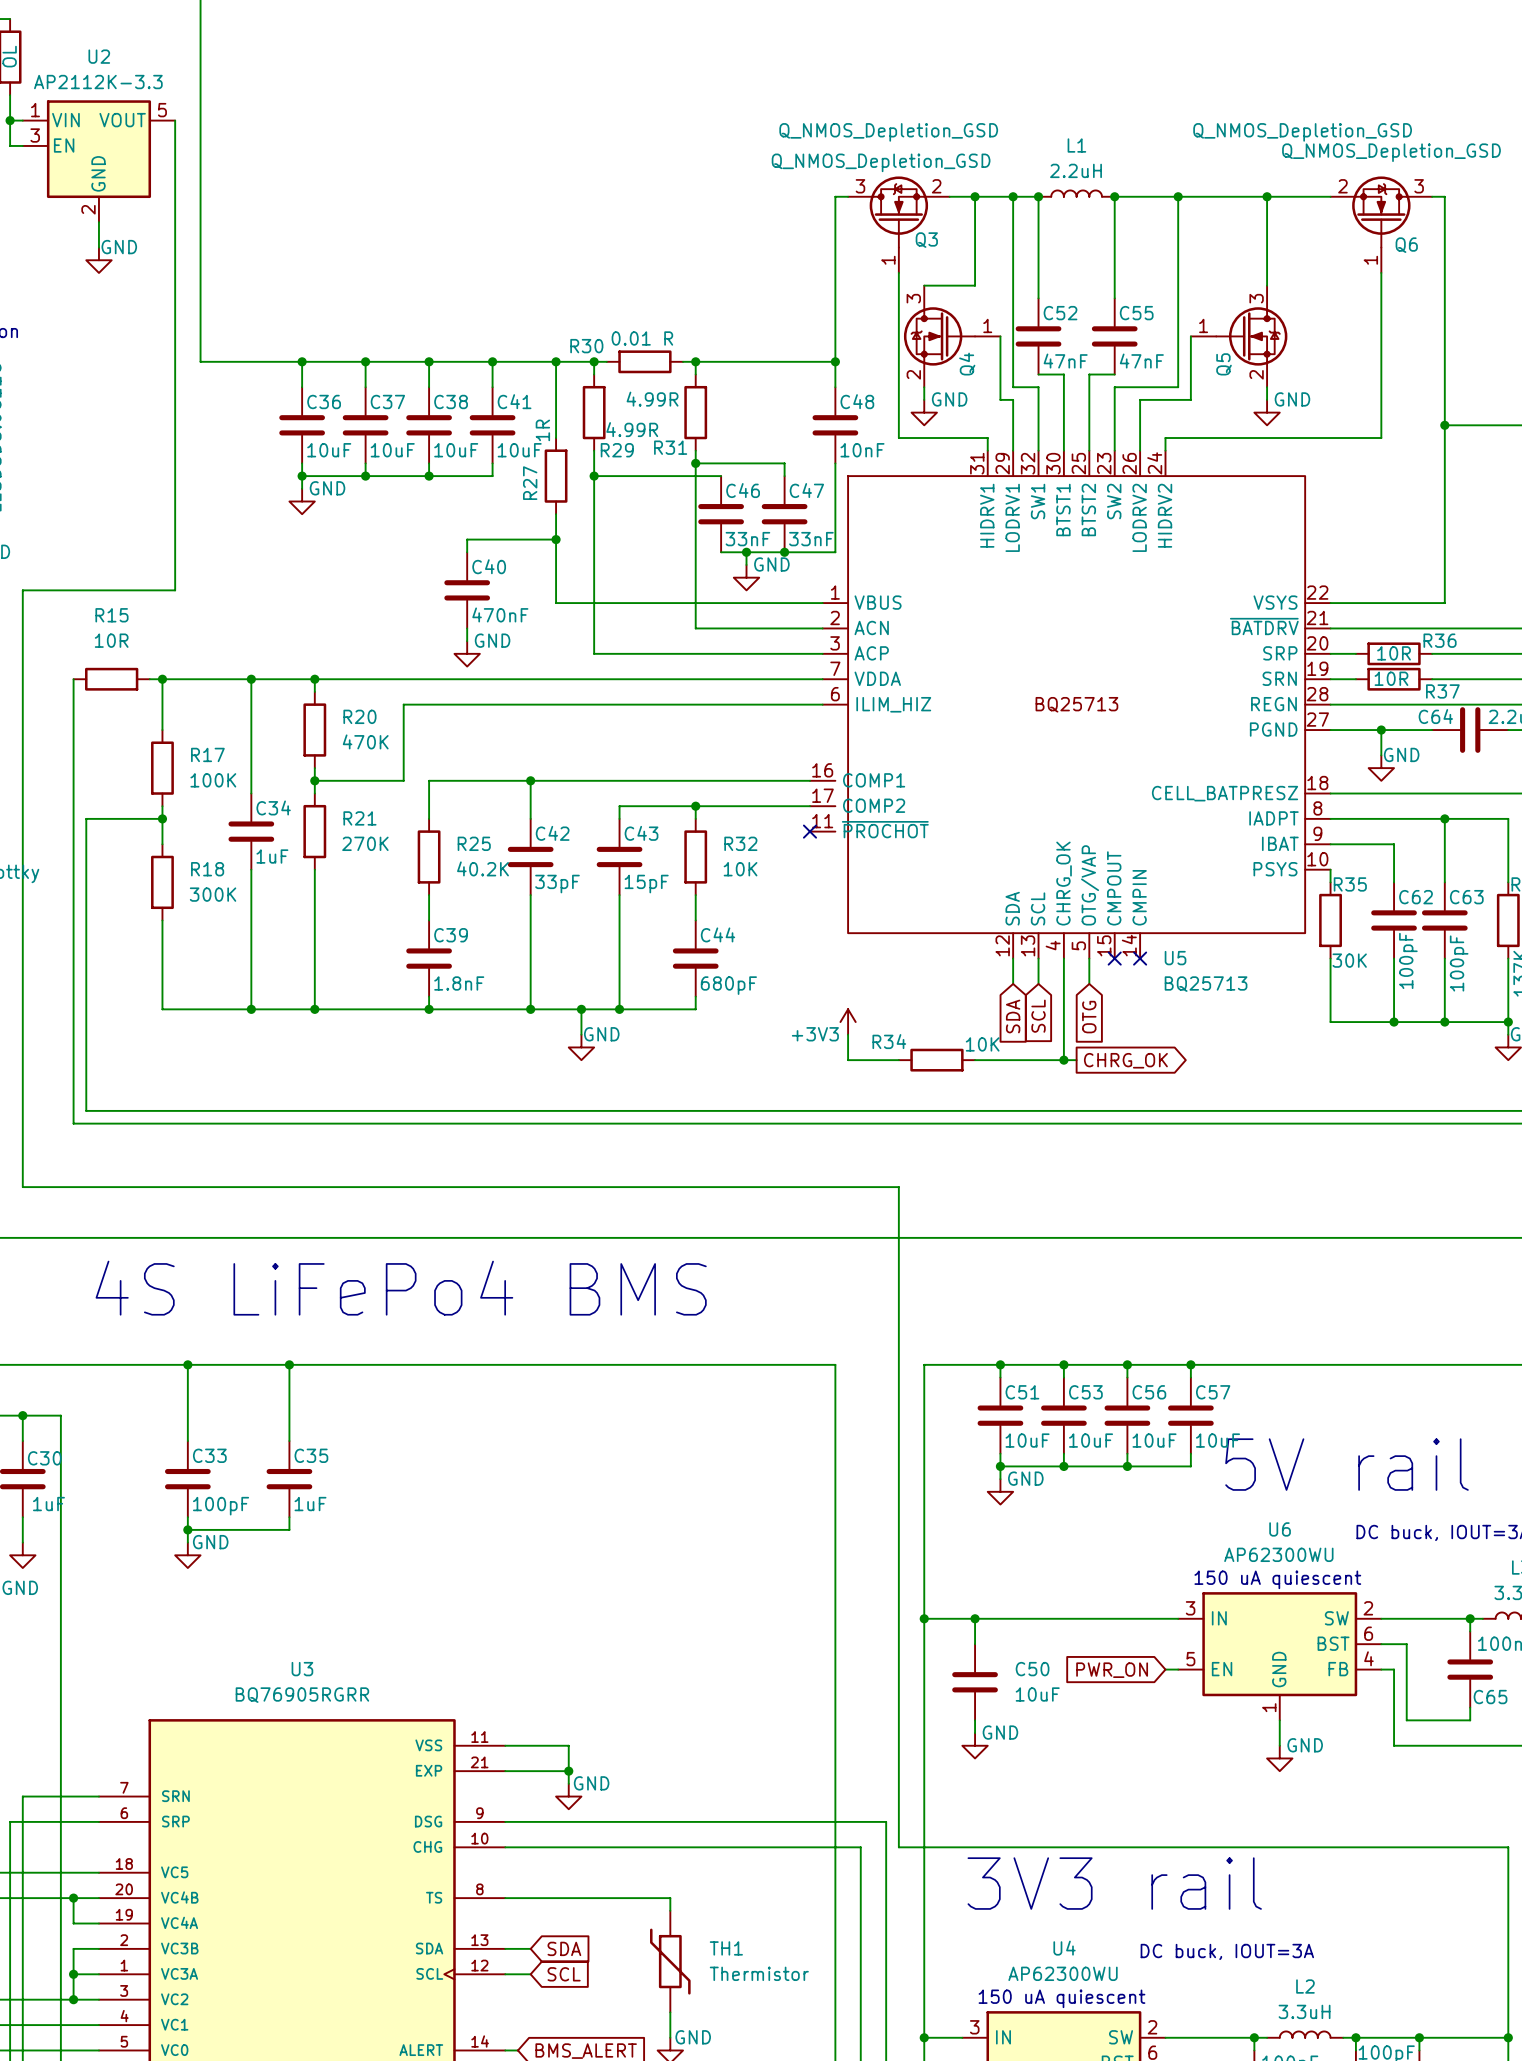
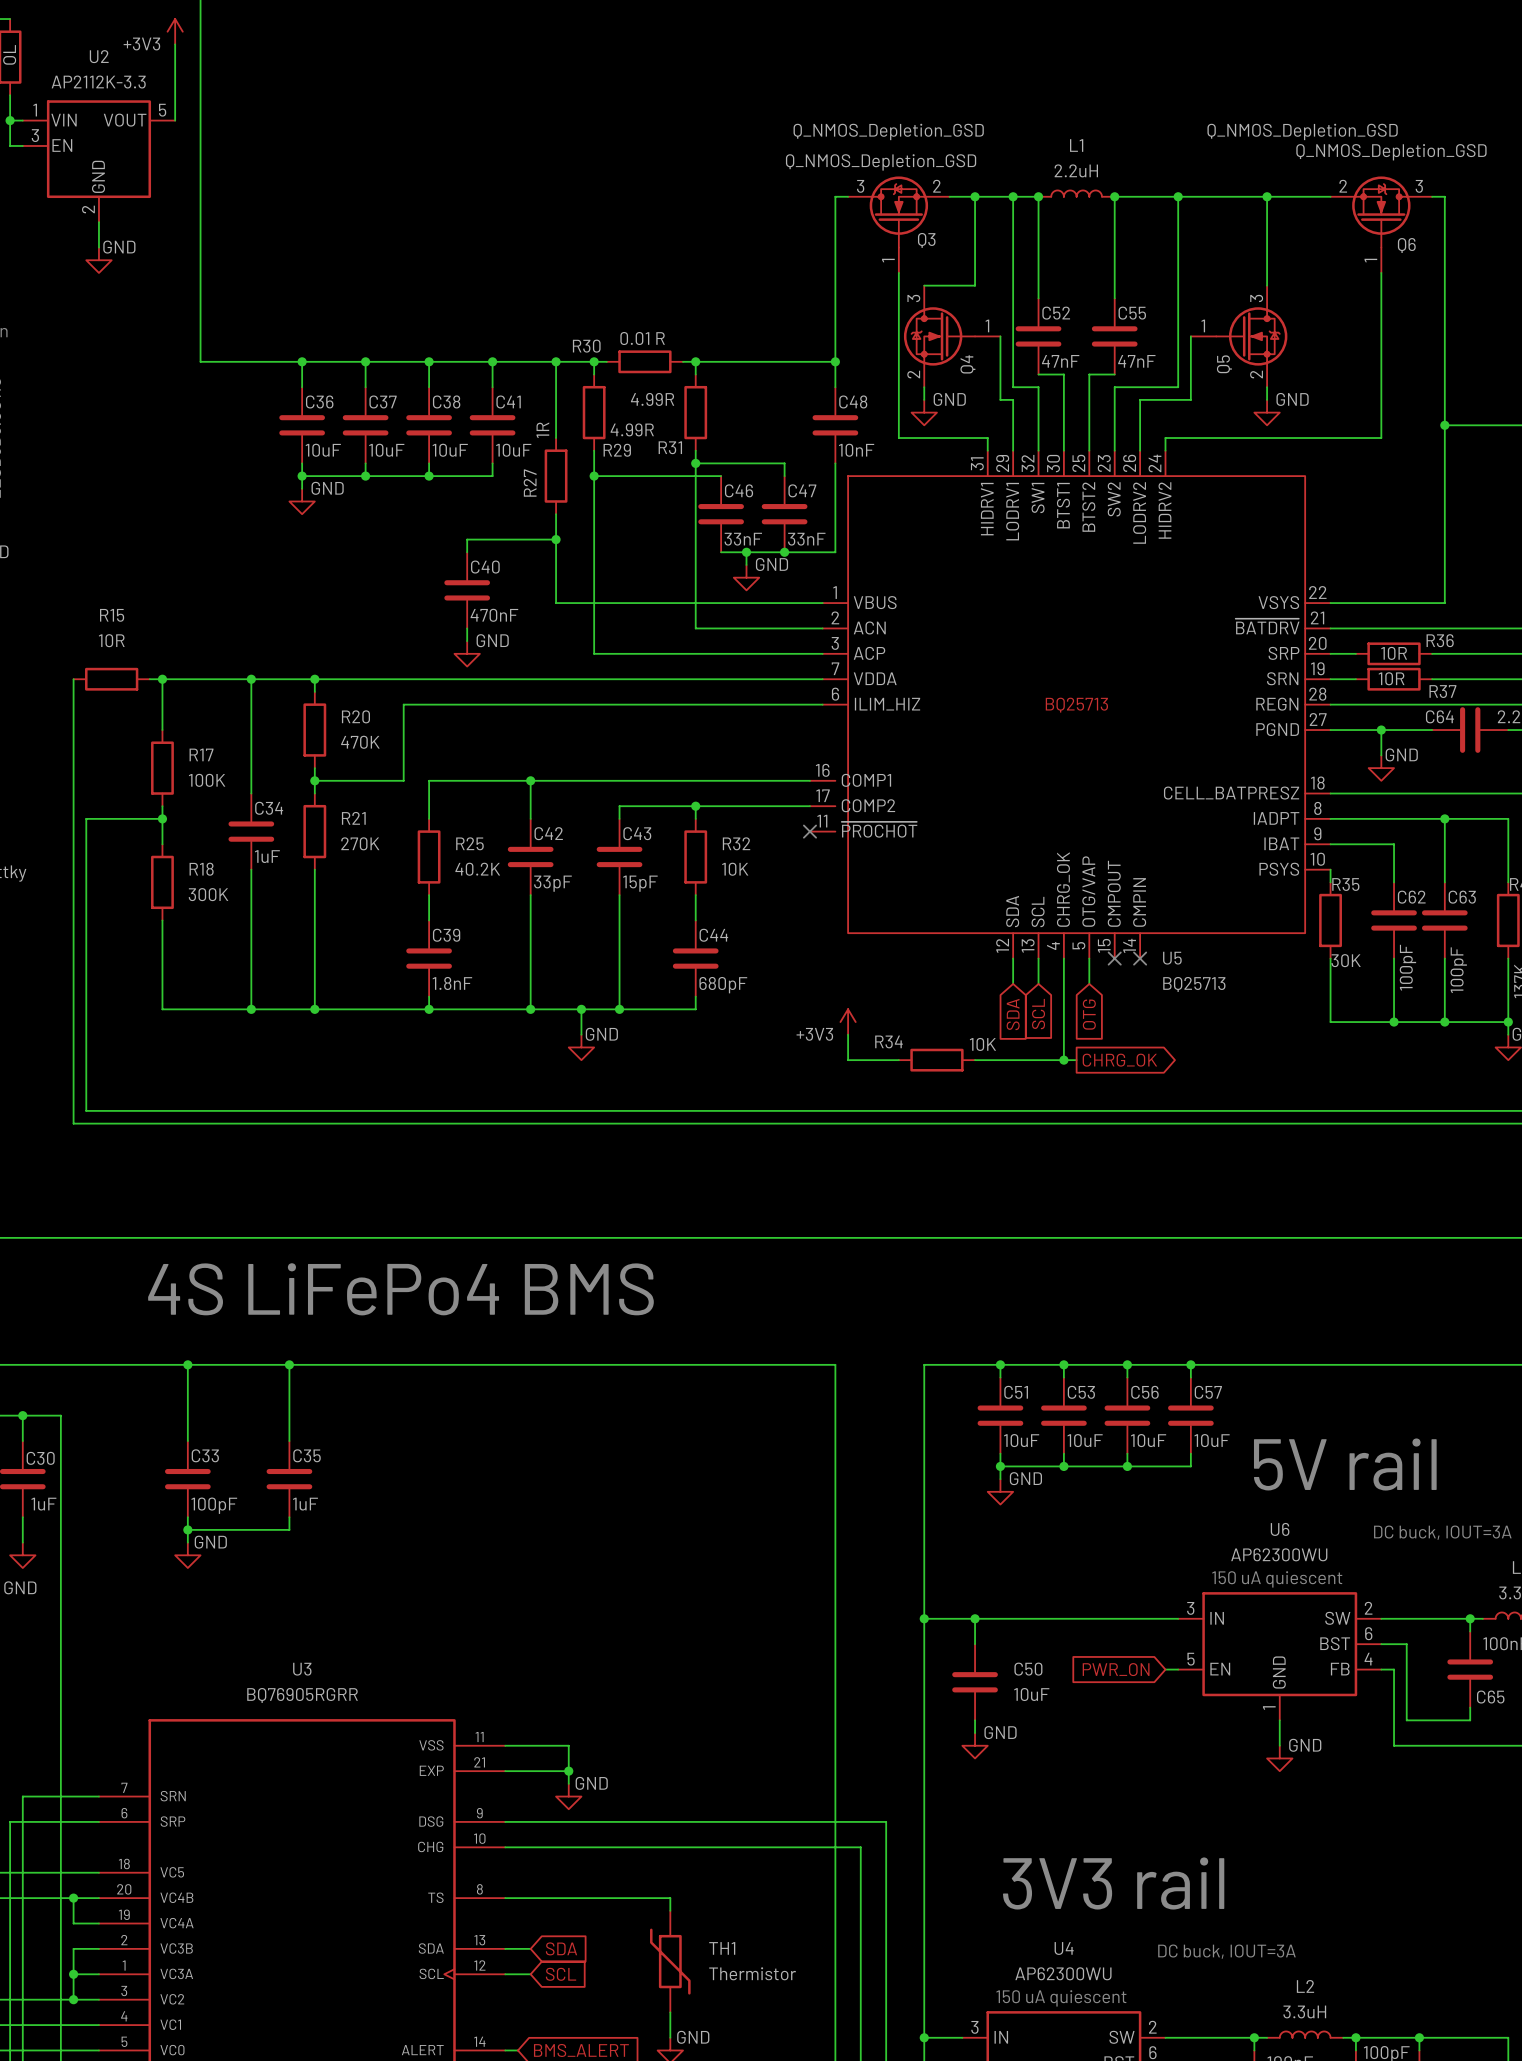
power symbol: none -> +3V3 (175, 31)
wire: (175, 120) (175, 590) (22, 590) (22, 1187) (898, 1187) (898, 1847) (1508, 1847) (1508, 2037) -> (175, 120) (175, 44)
junction: (1508, 2037) -> none

